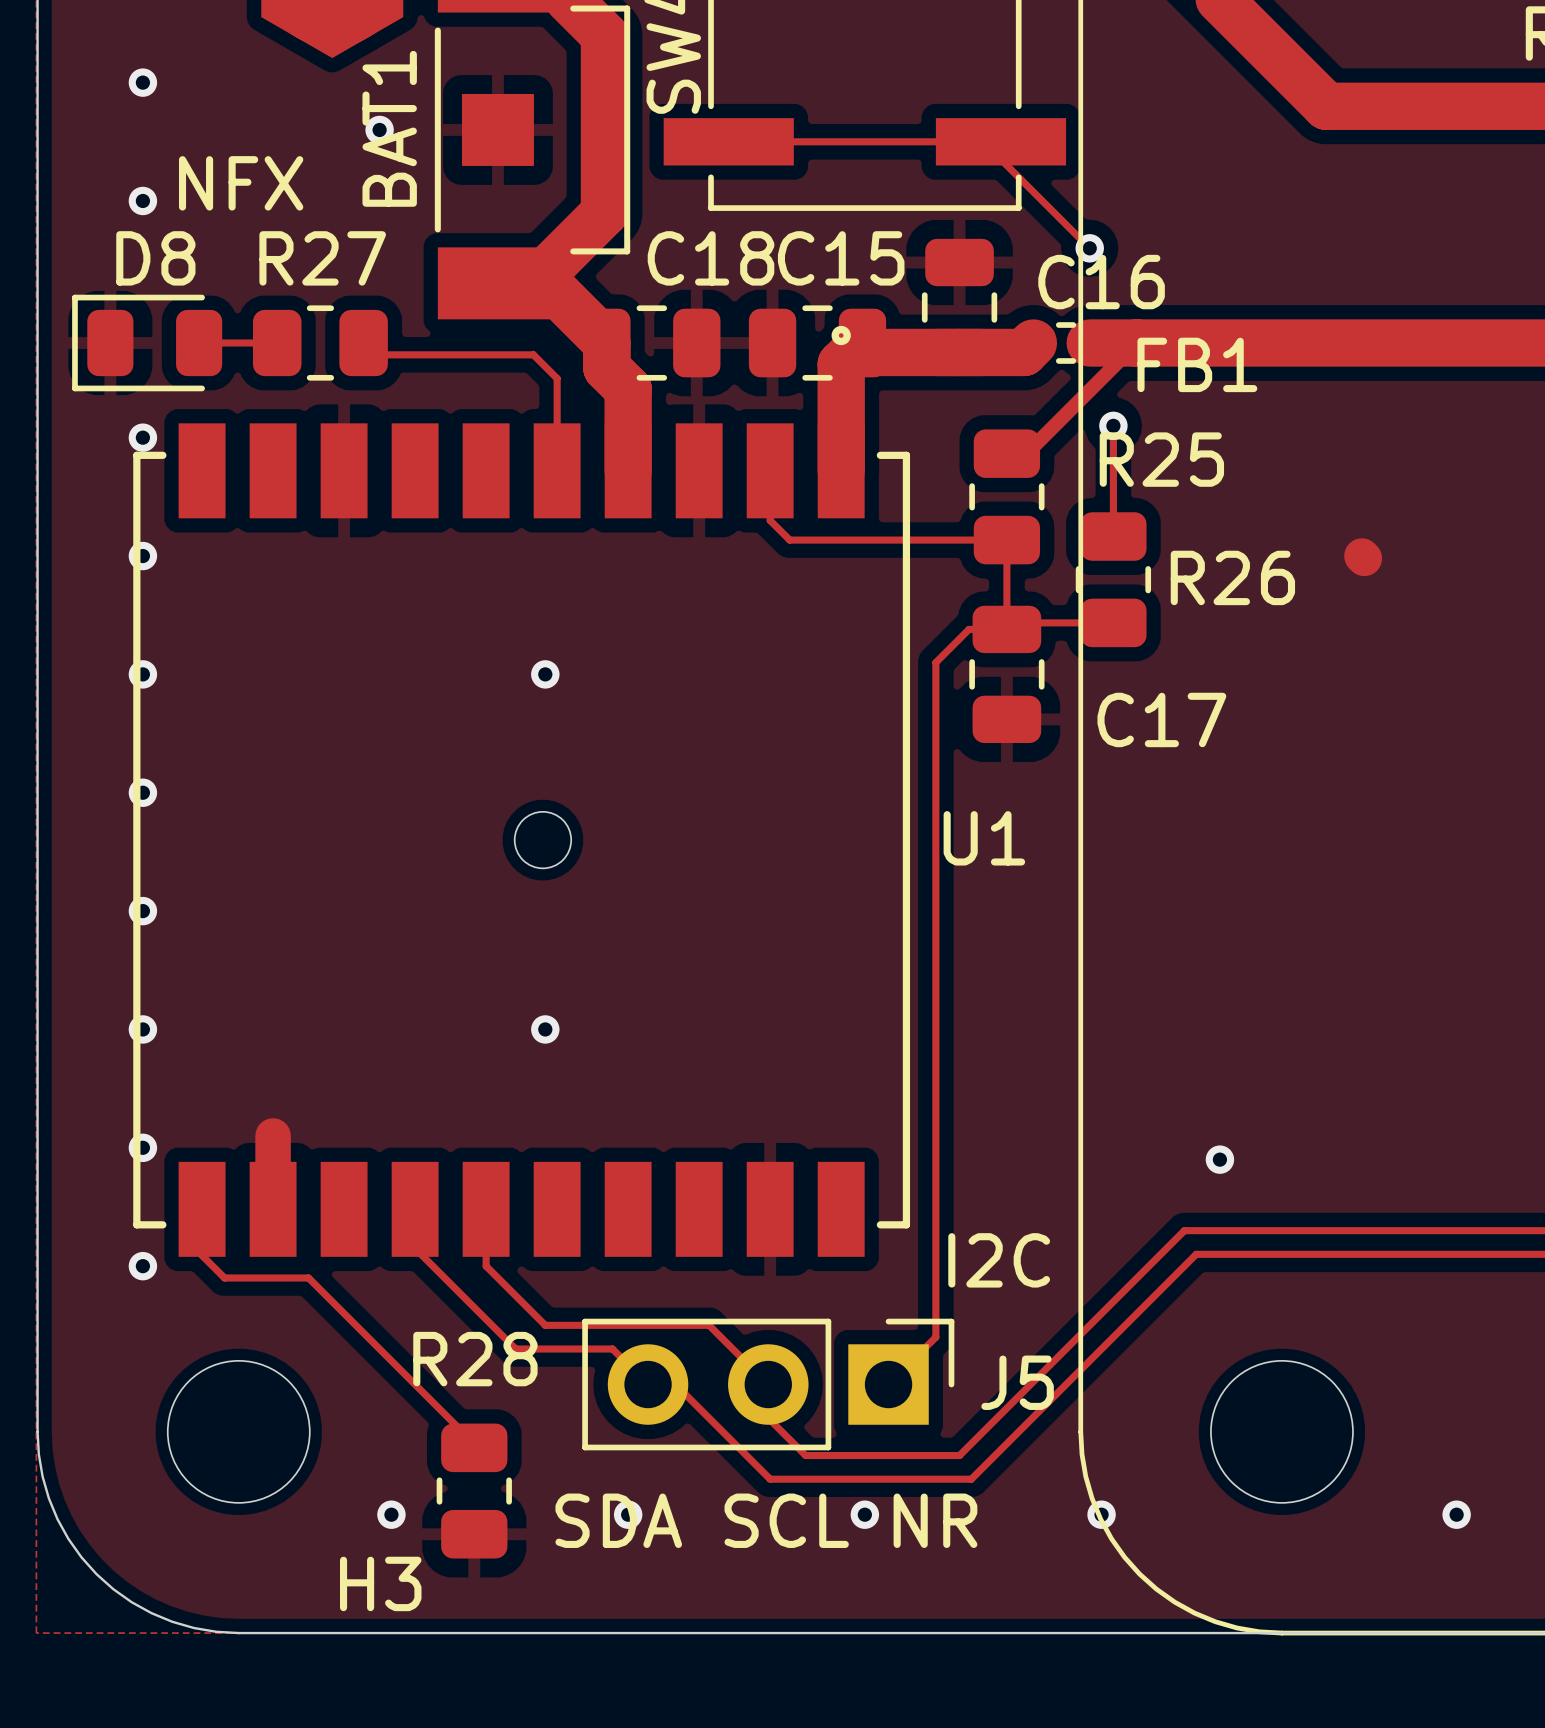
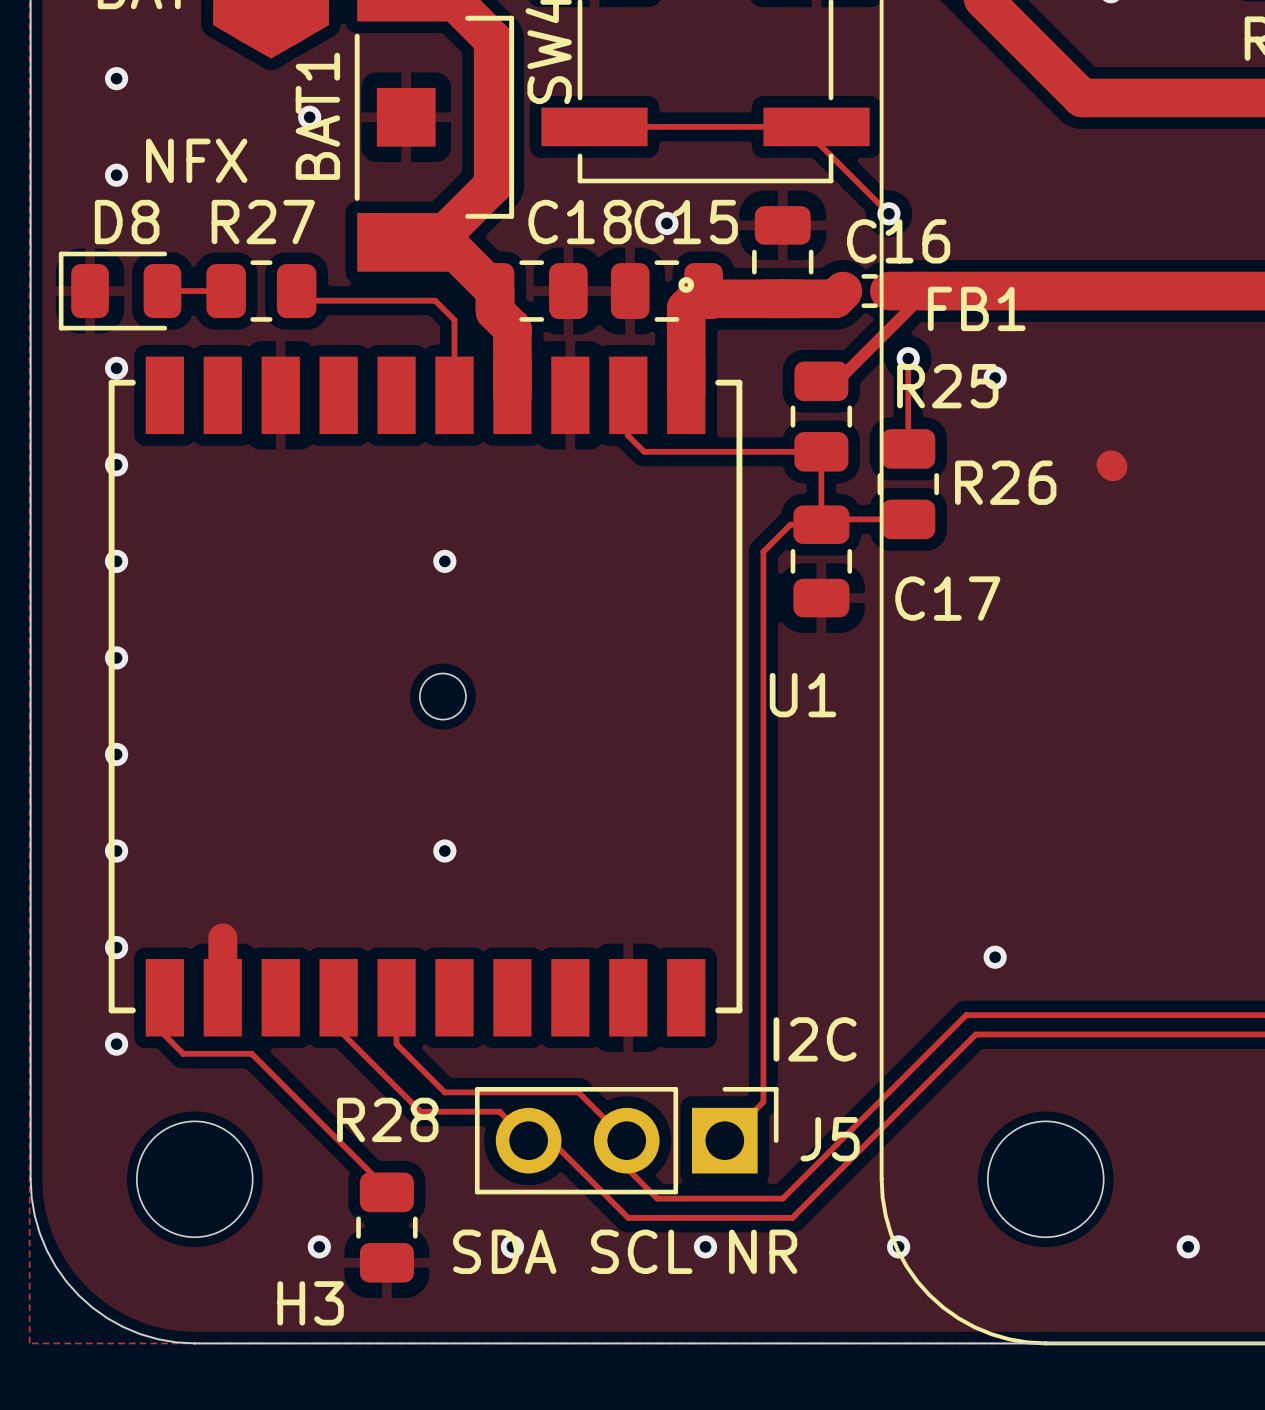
via: none -> (666, 223)
via: none -> (995, 377)

